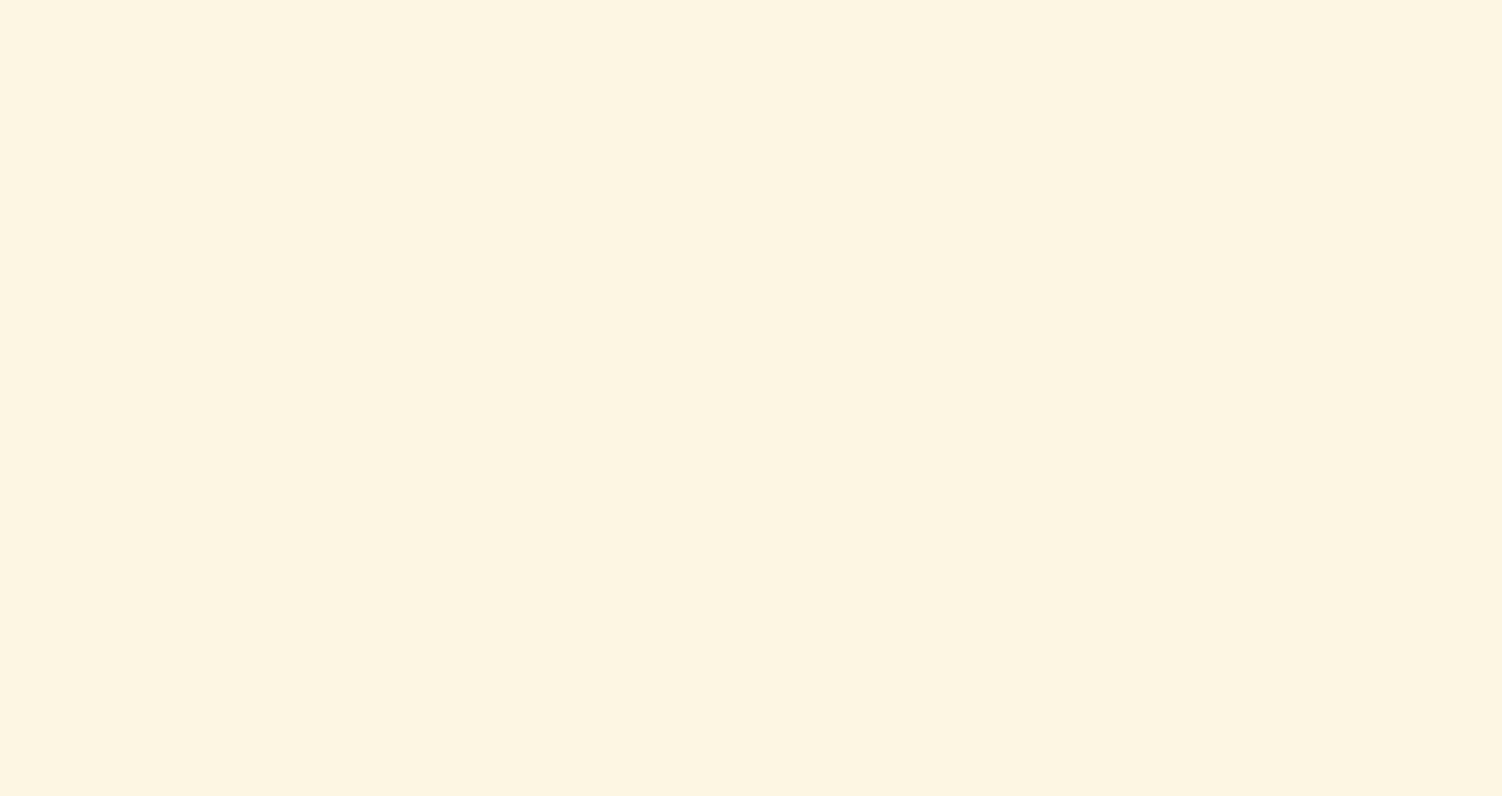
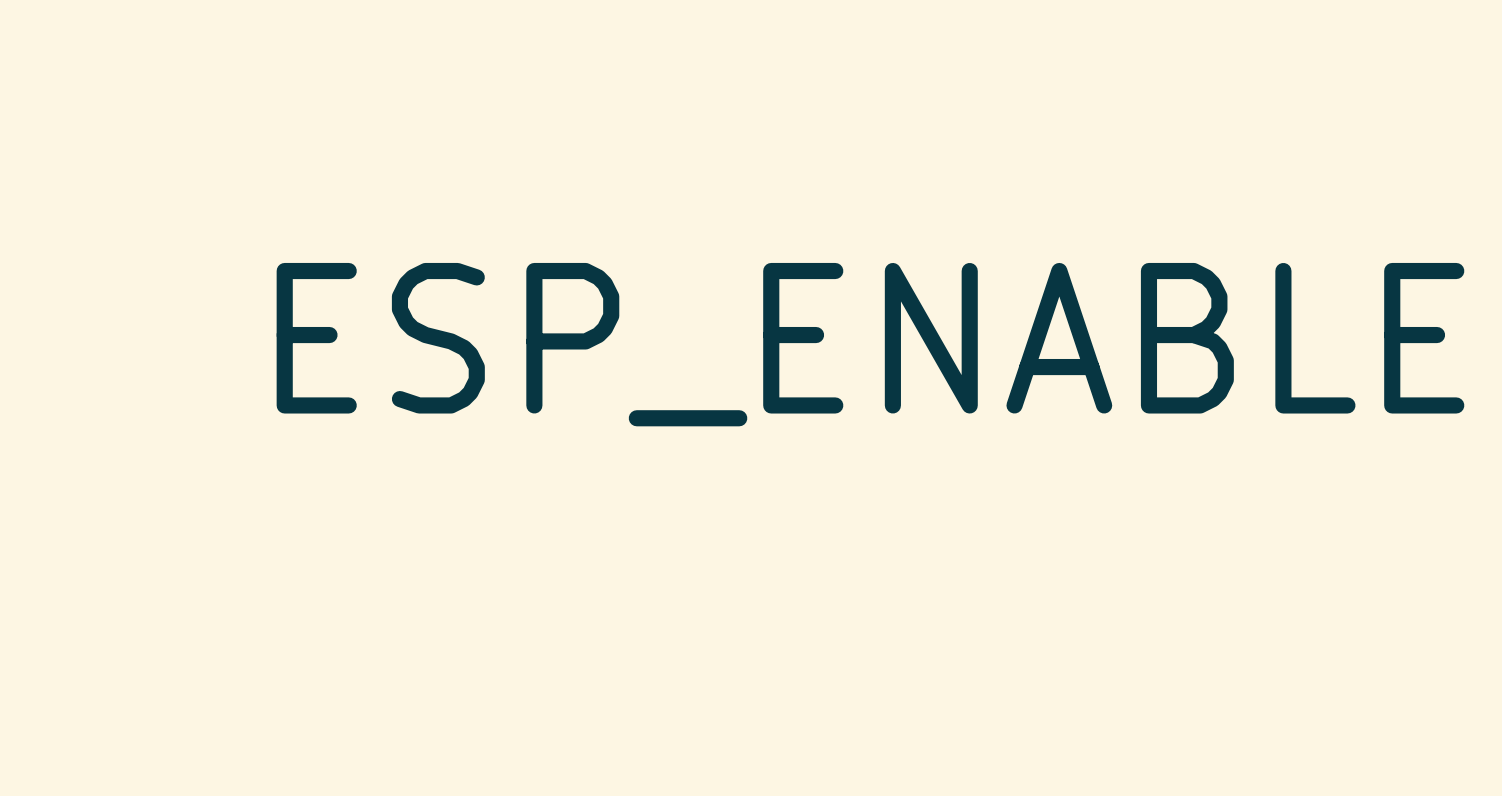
label: none -> ESP_ENABLE (870, 344)

